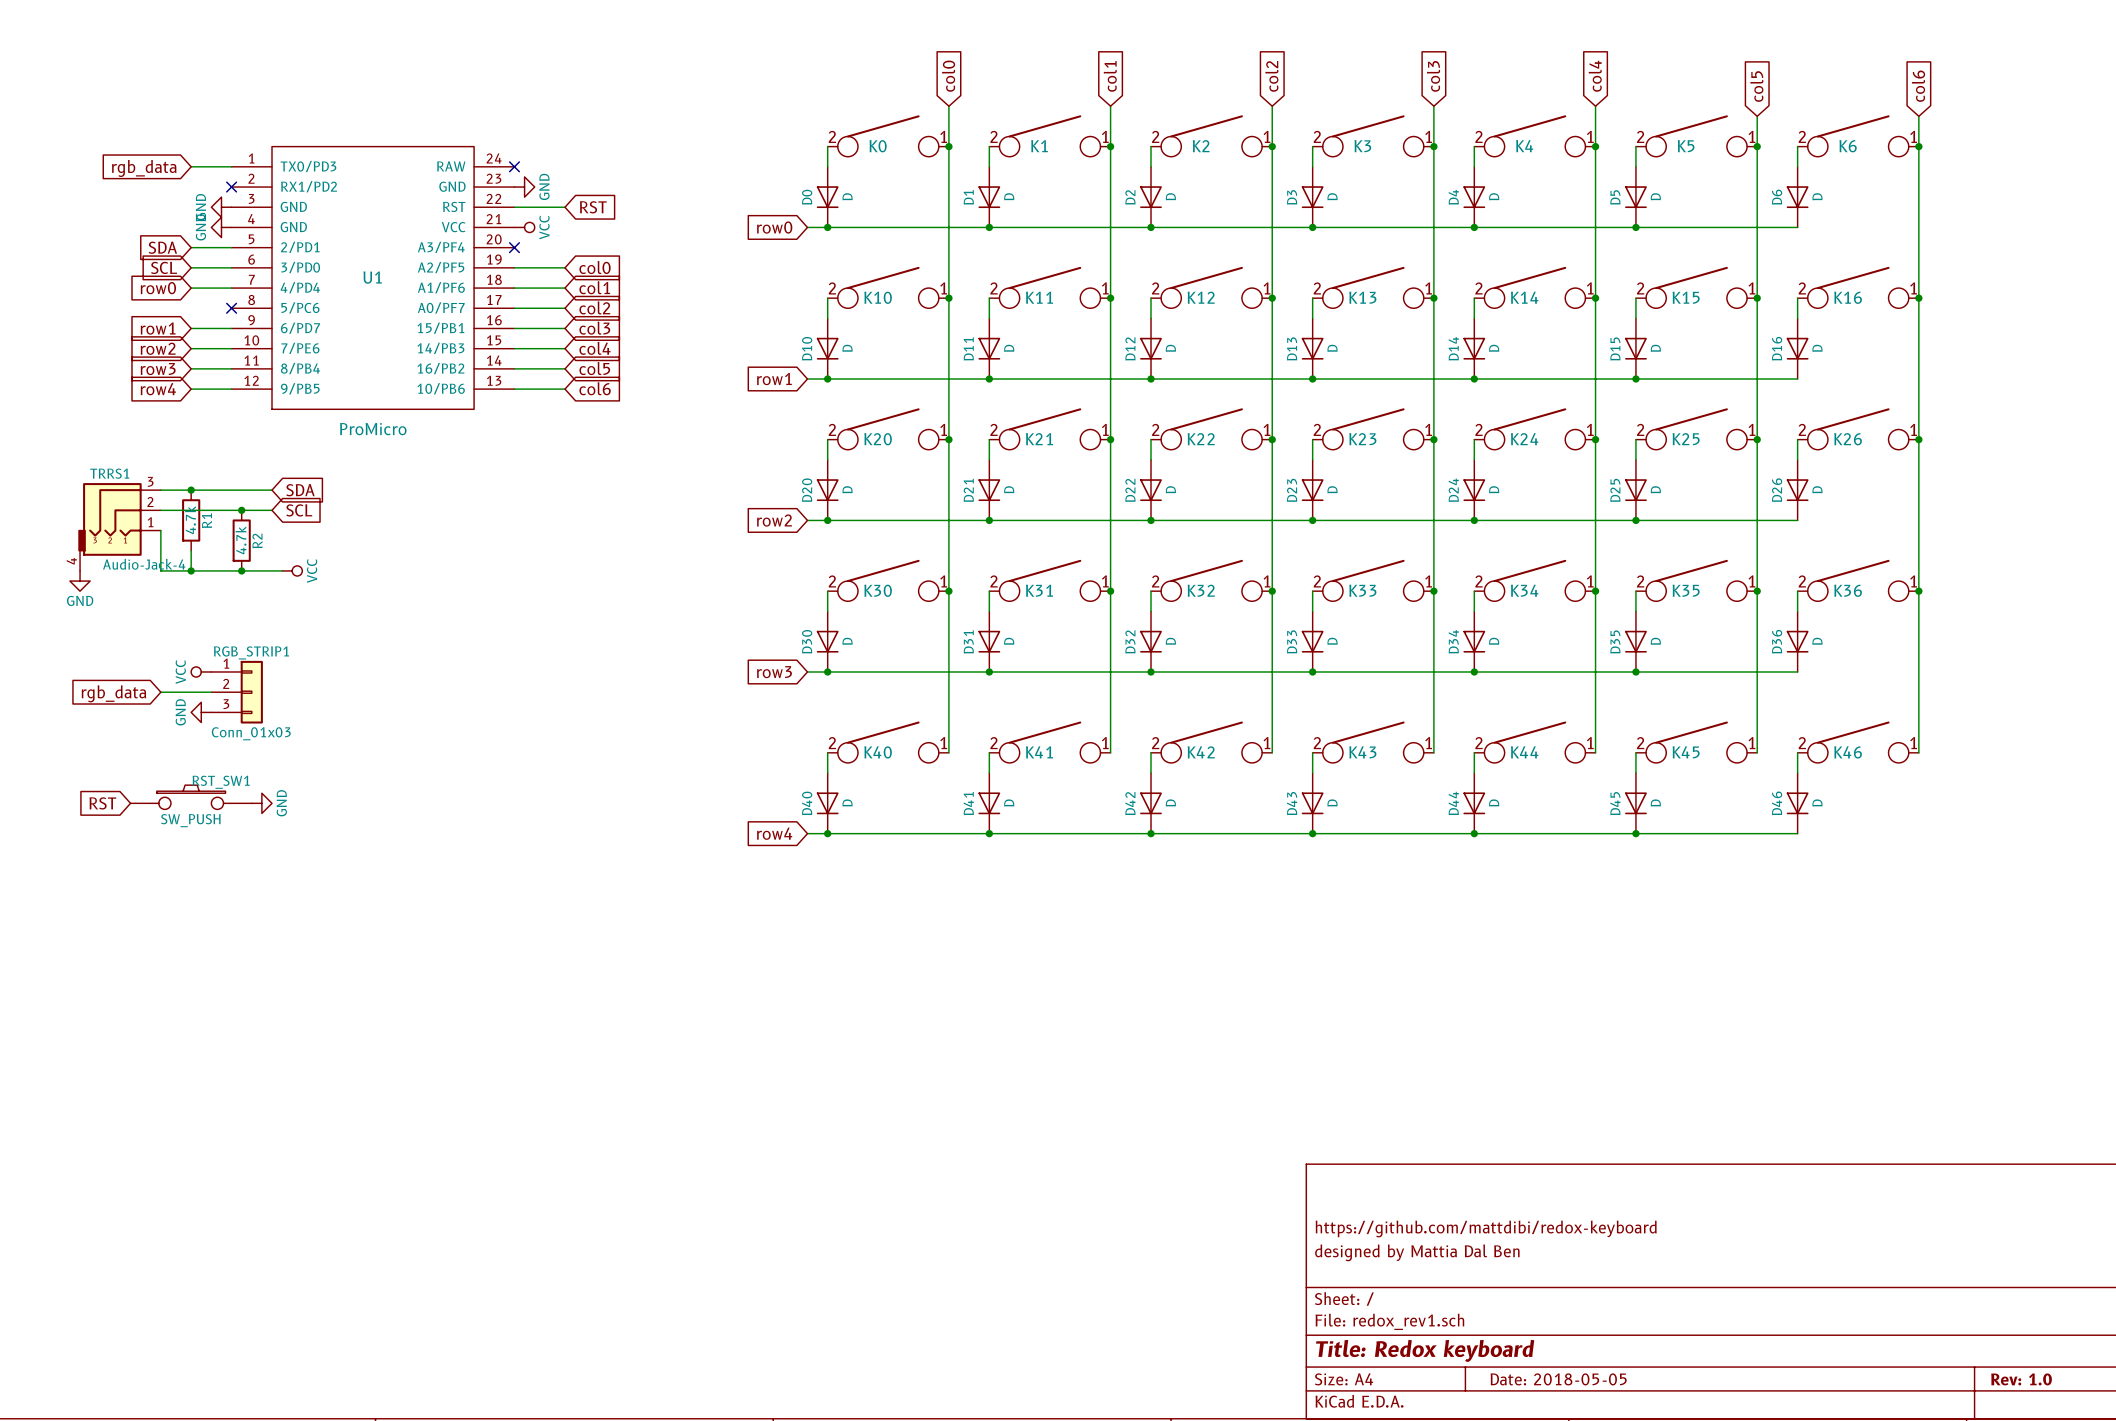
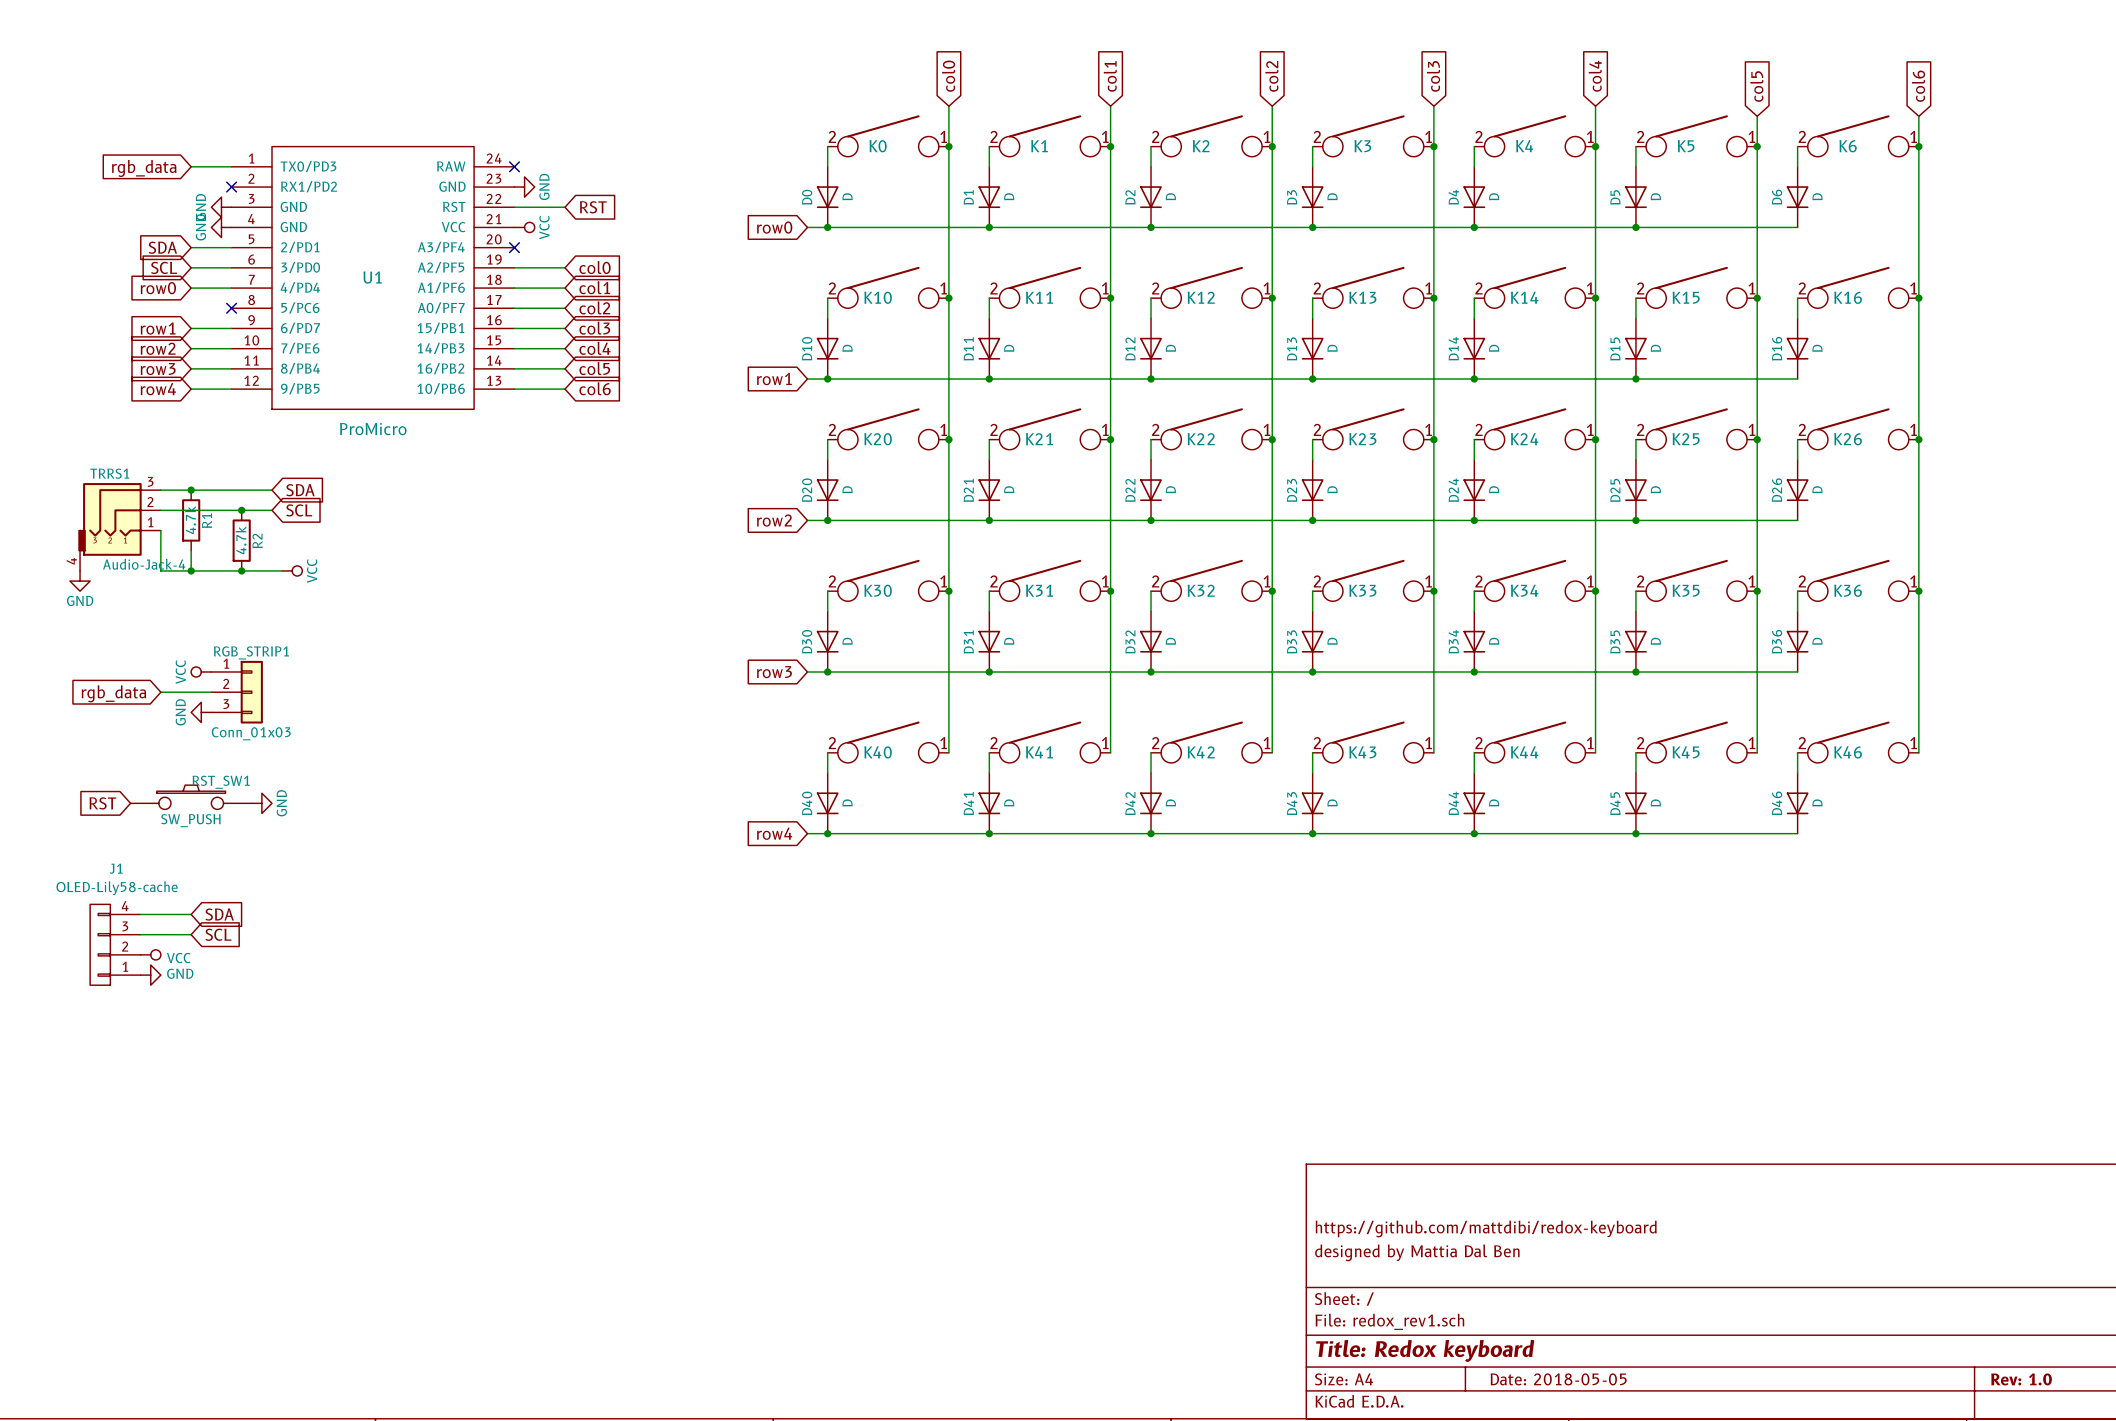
wire: none -> (140, 914) (191, 914)
global label: none -> SDA (219, 914)
wire: none -> (140, 934) (191, 934)
global label: none -> SCL (218, 934)
J1: none -> OLED-Lily58-cache (115, 944)
power symbol: none -> VCC (150, 954)
power symbol: none -> GND (150, 975)

